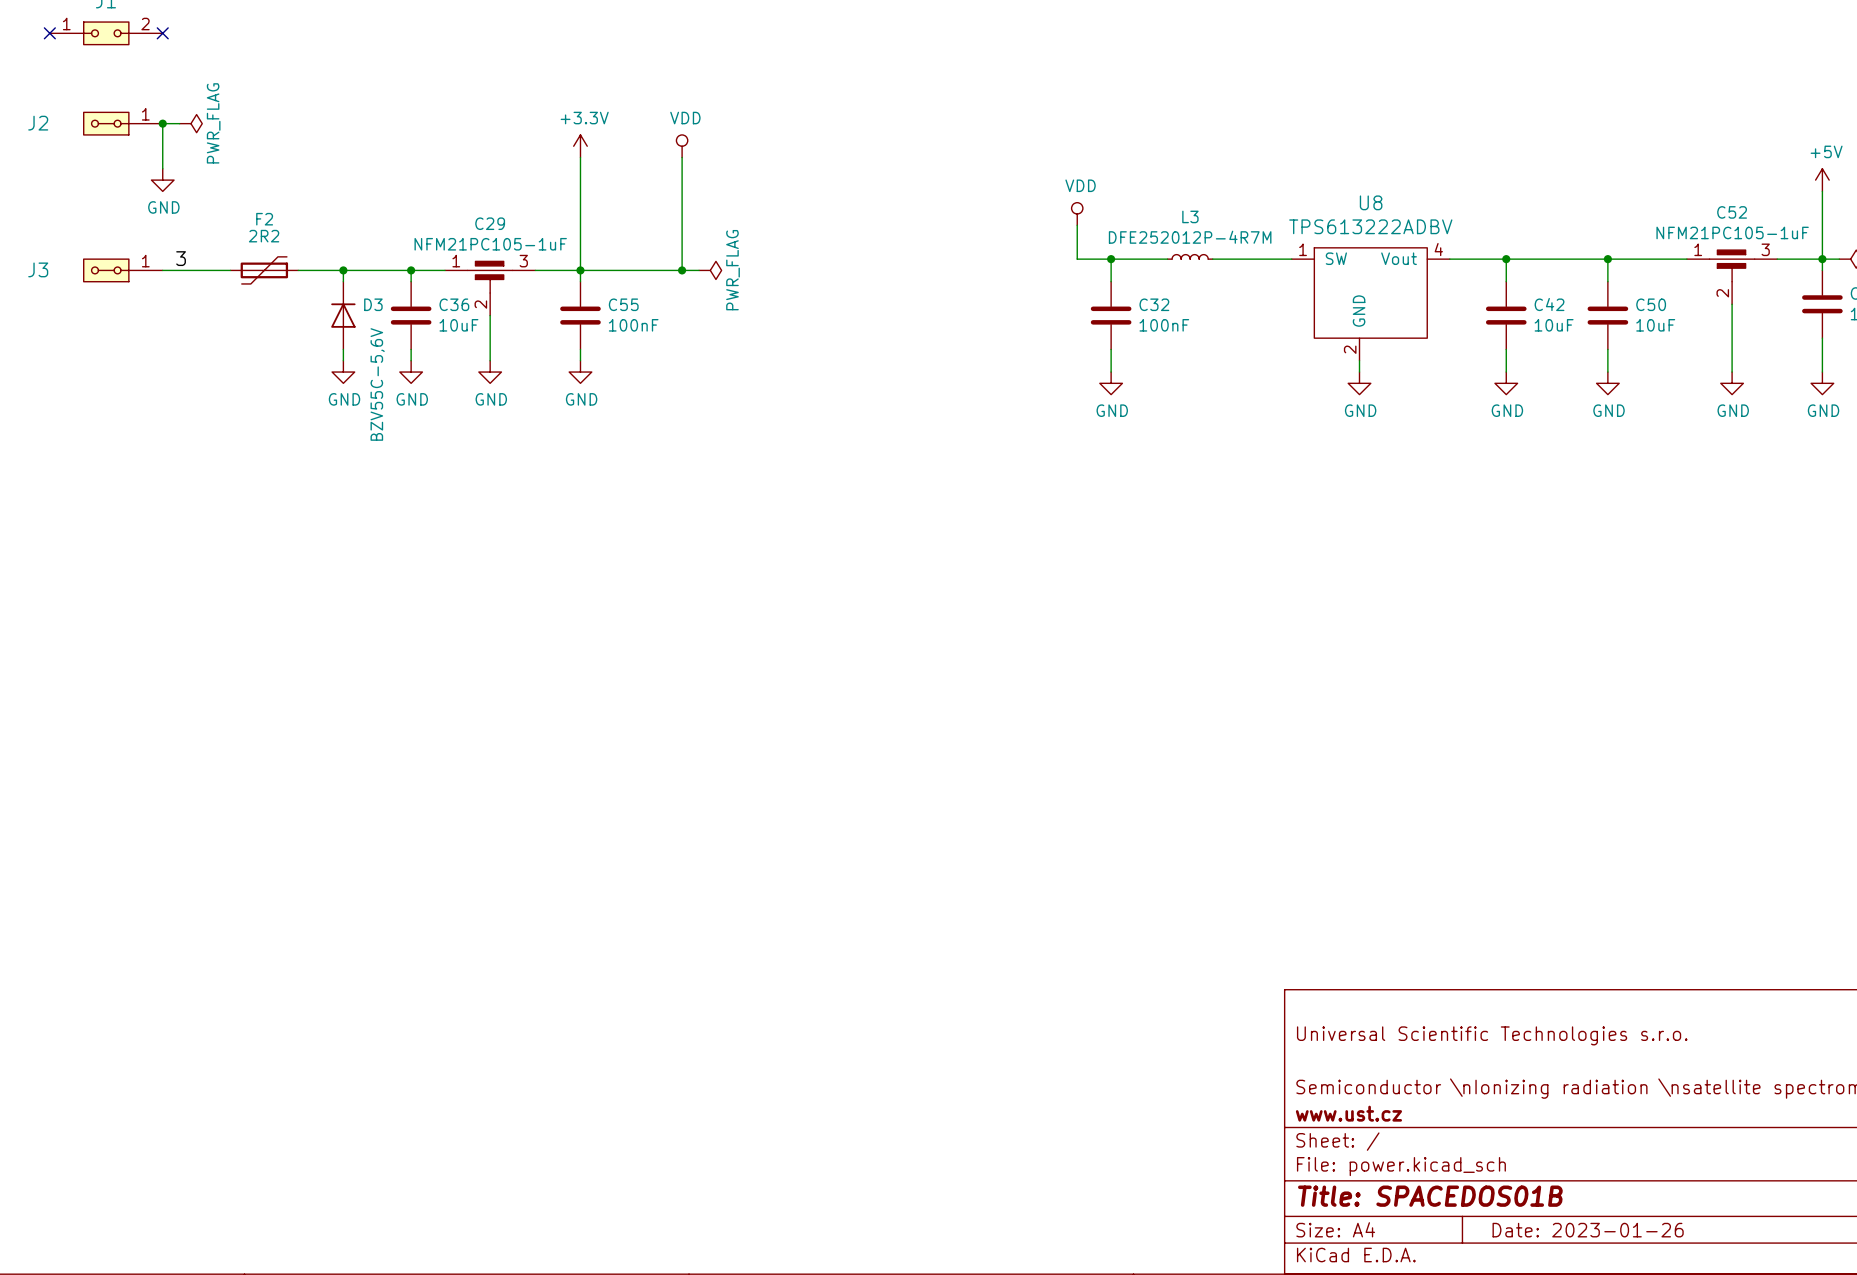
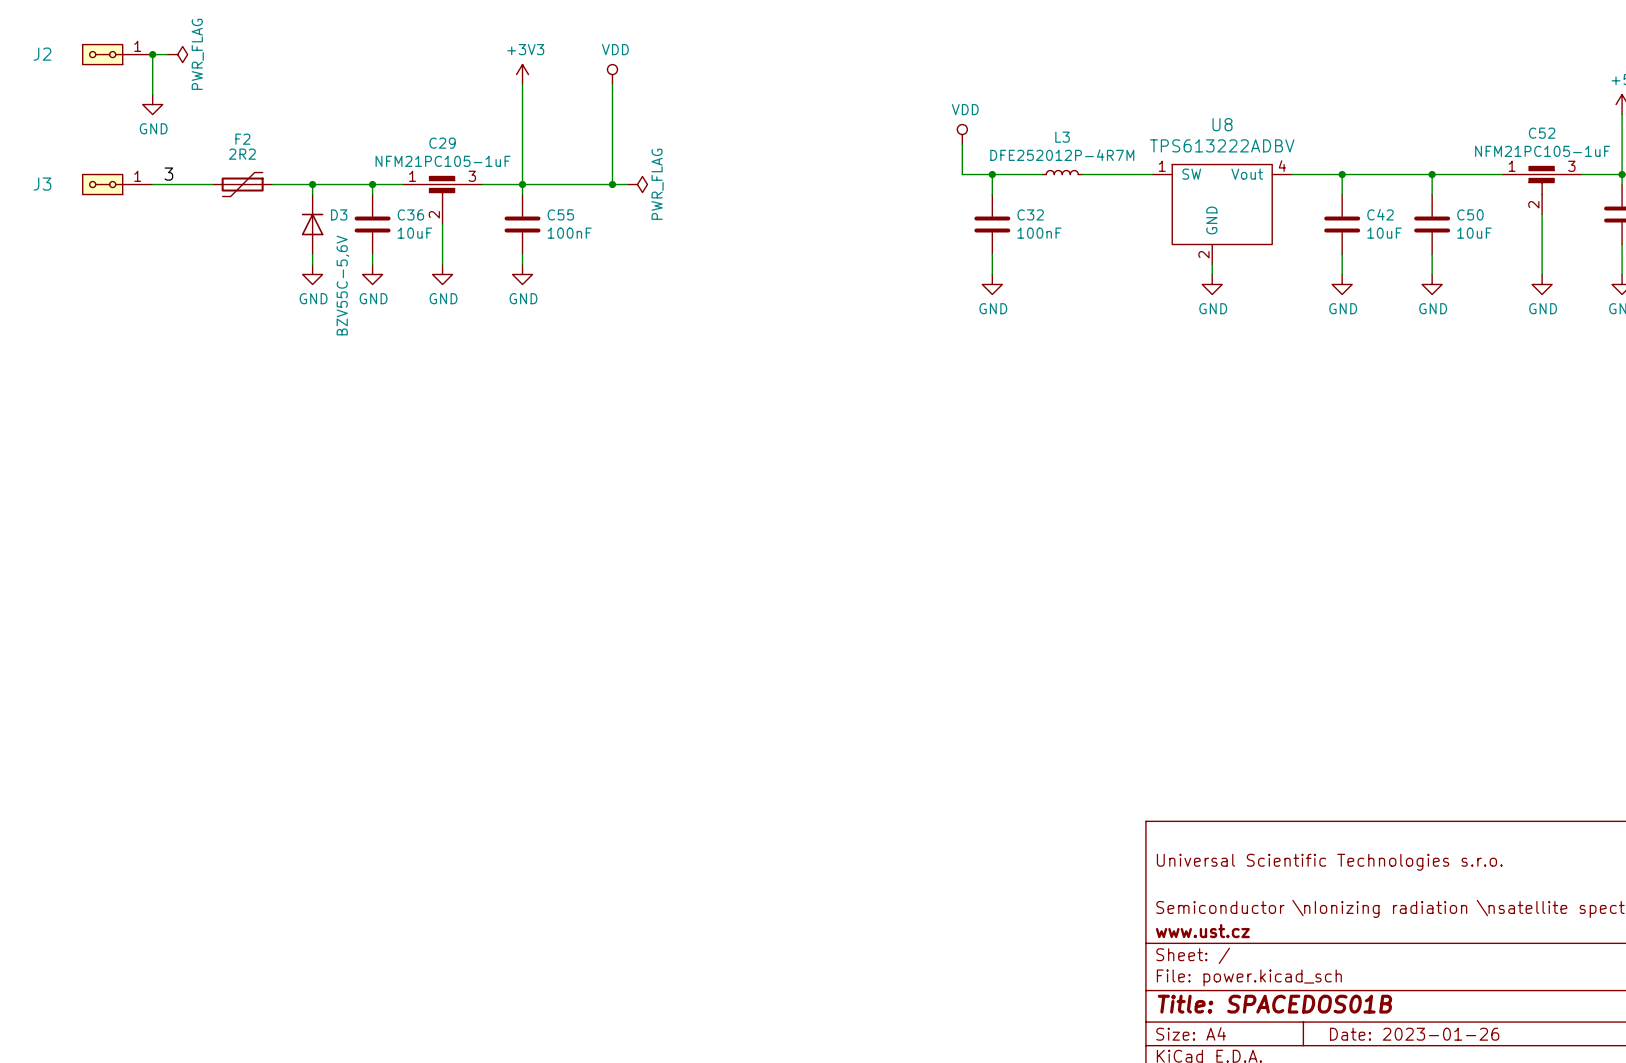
power symbol: +3.3V (580, 146) -> +3V3 (522, 74)

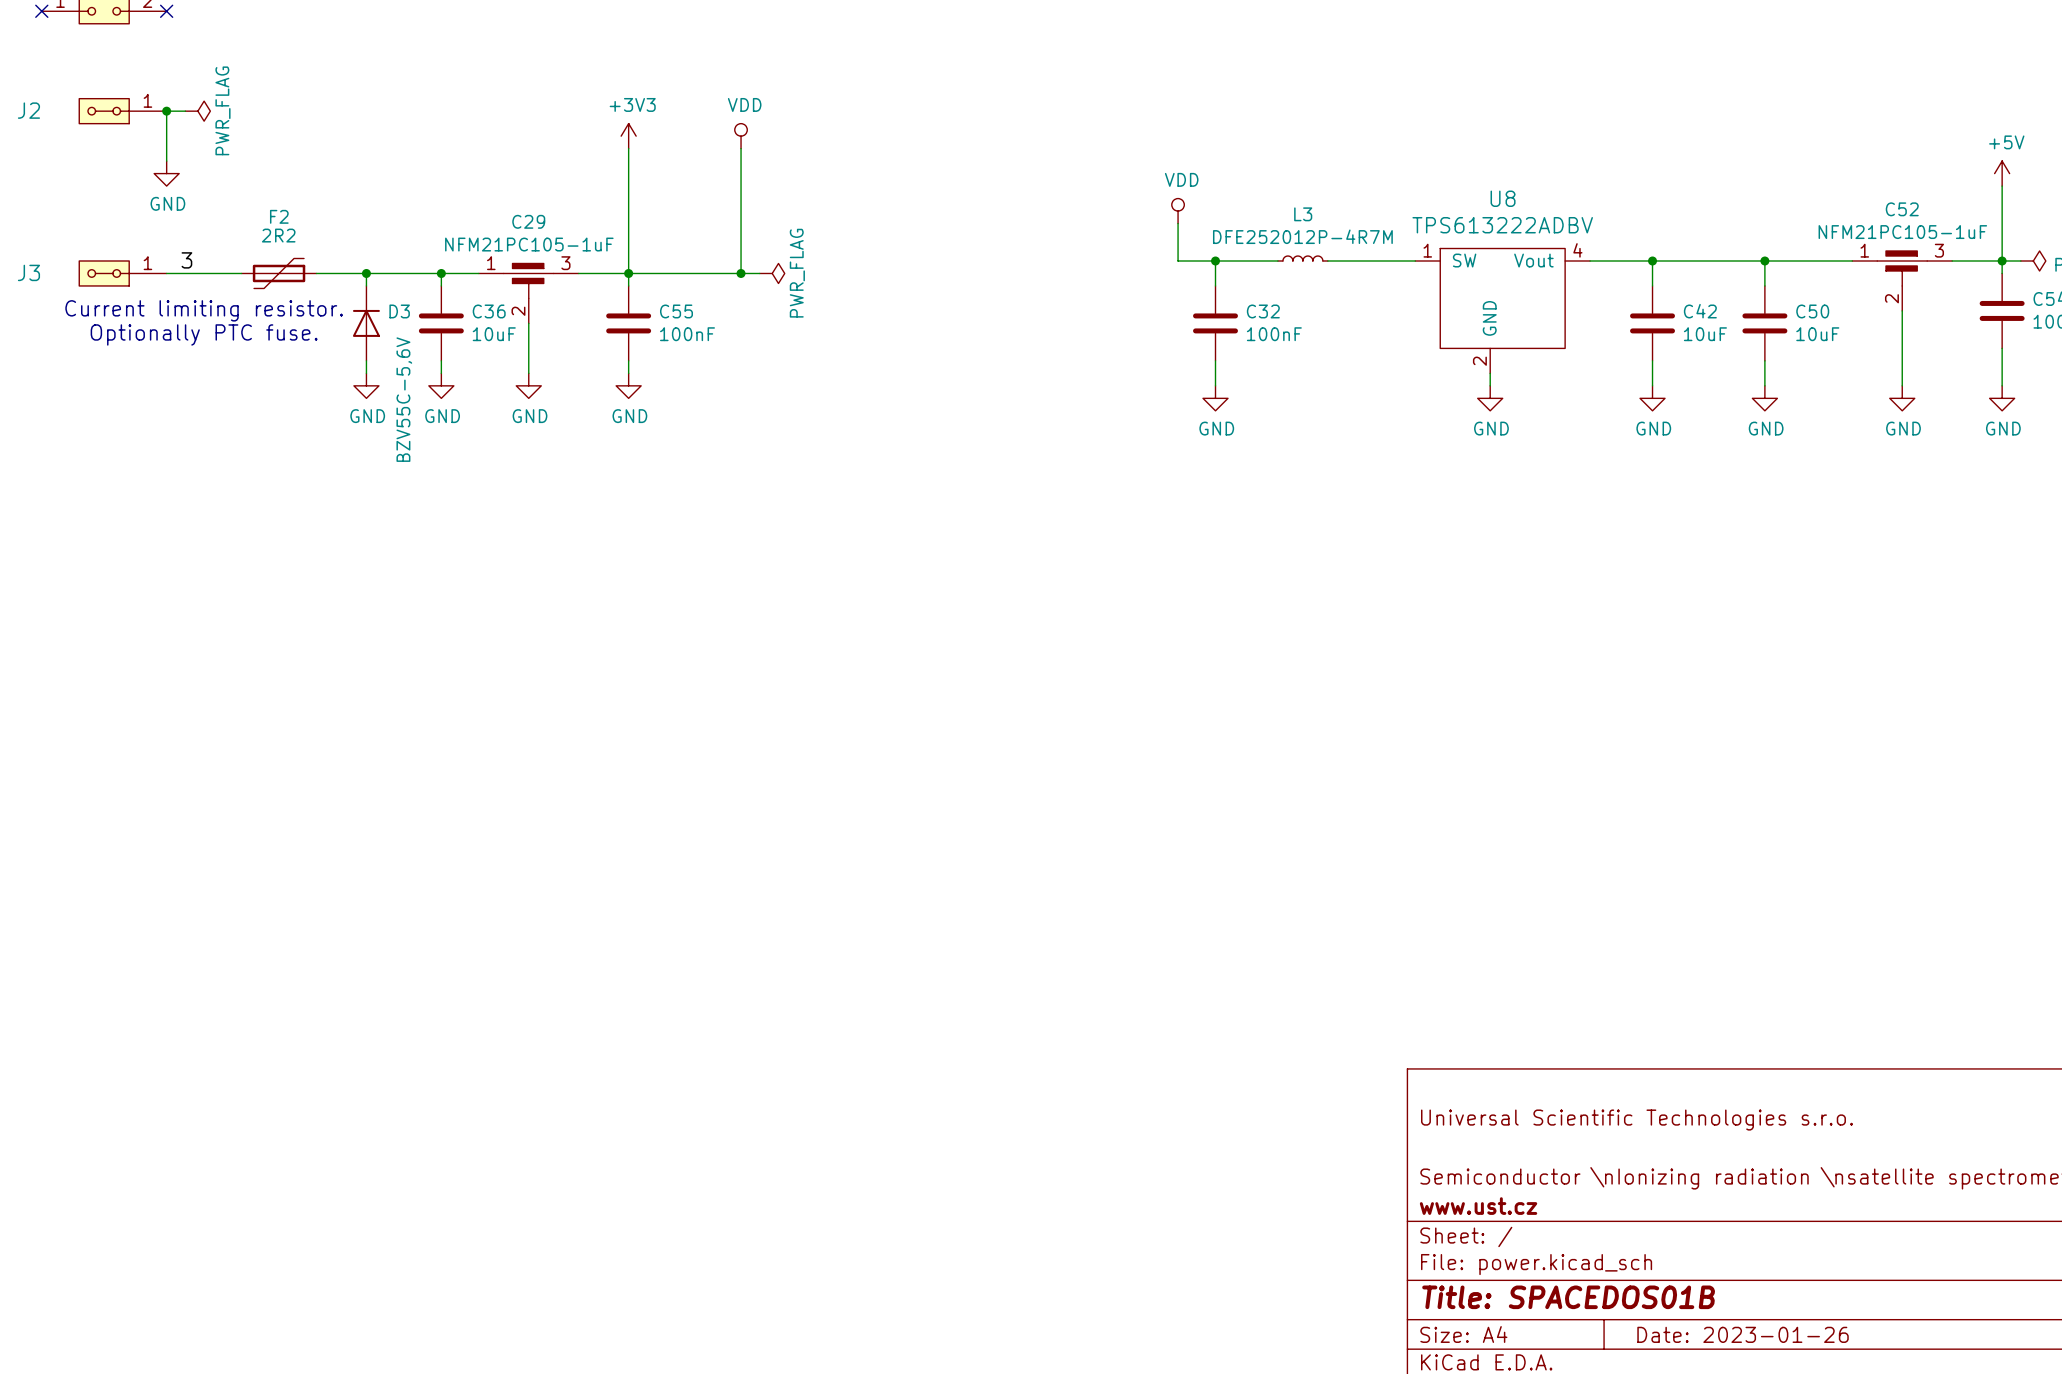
text: none -> Current limiting resistor. (204, 310)
text: none -> Optionally PTC fuse. (204, 334)

